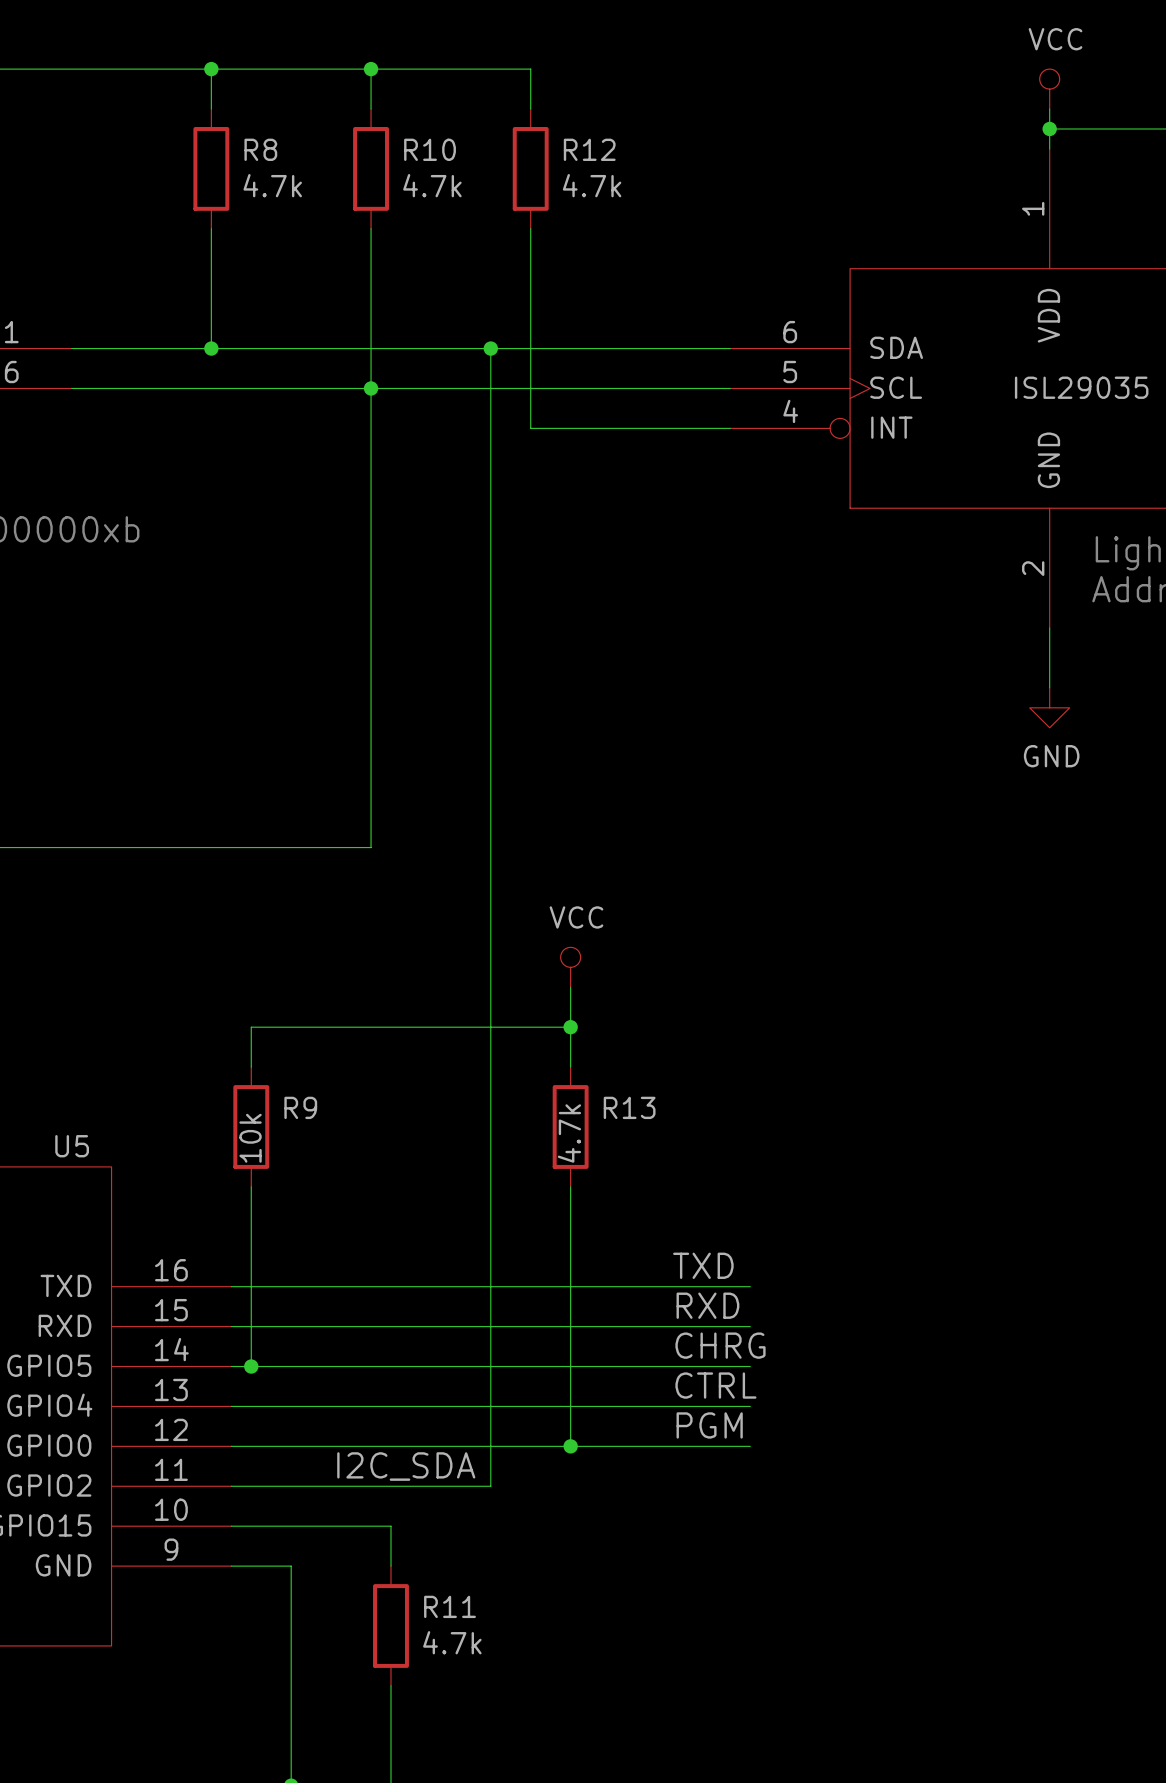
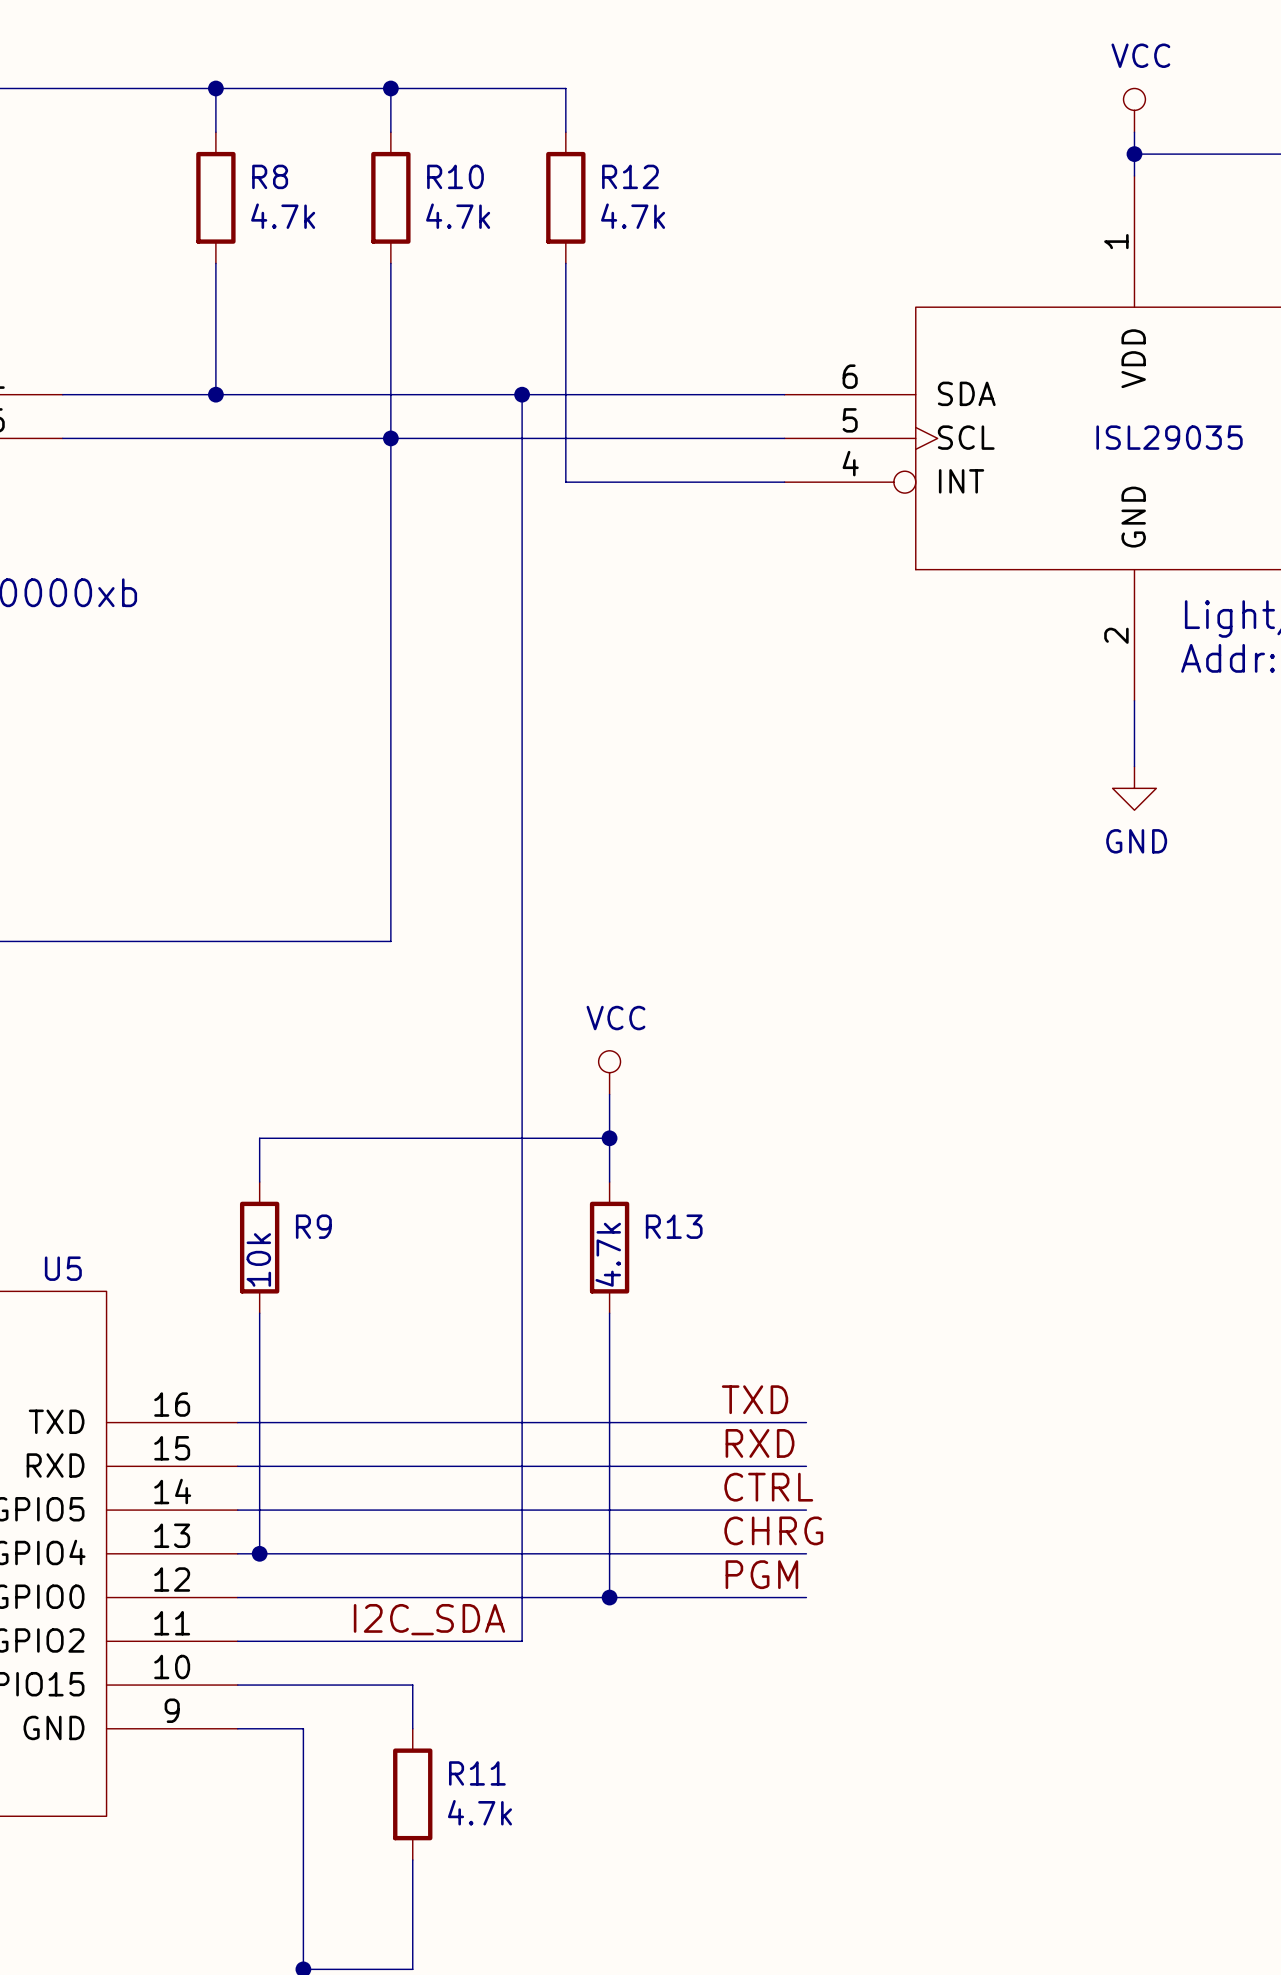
label: CHRG (720, 1345) -> CTRL (768, 1487)
wire: none -> (259, 1510) (259, 1553)
junction position: (251, 1366) -> (259, 1553)
label: CTRL (715, 1385) -> CHRG (773, 1530)

